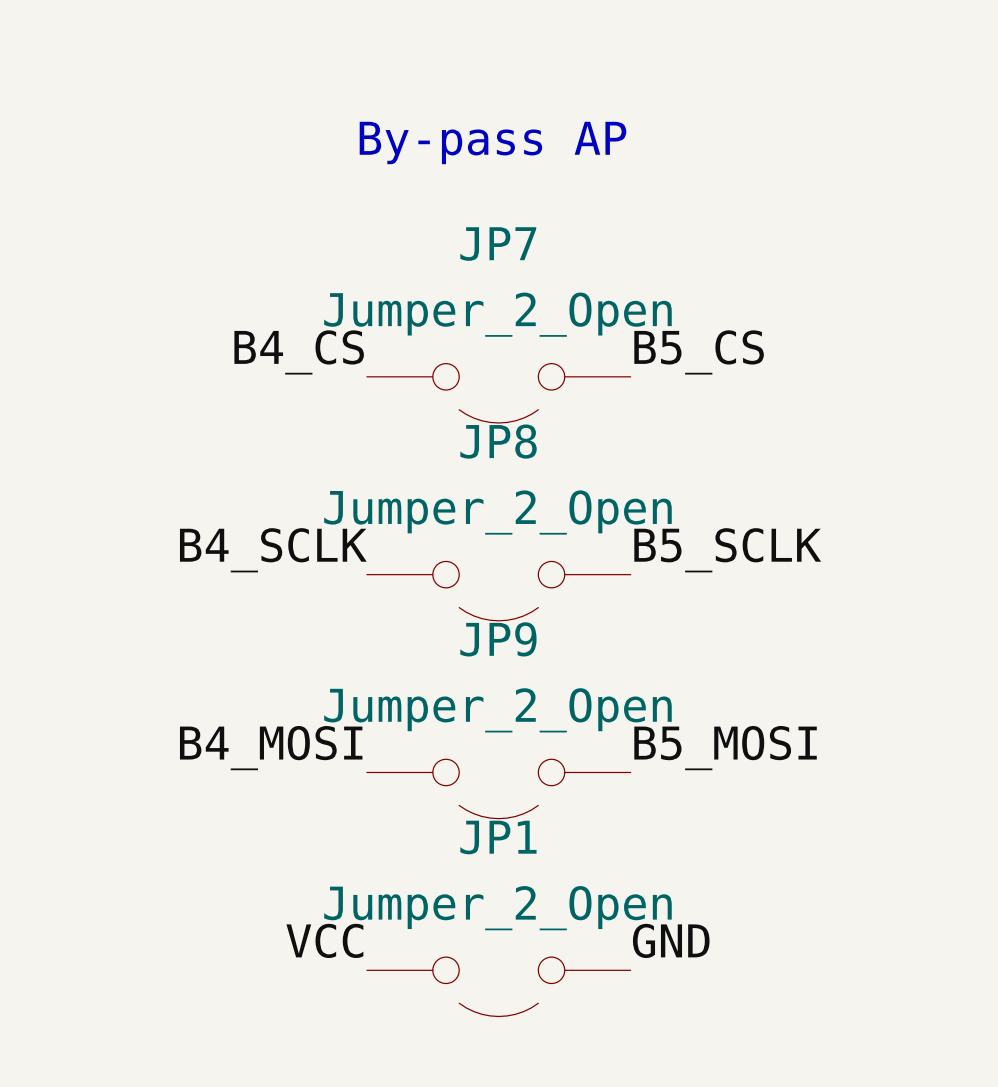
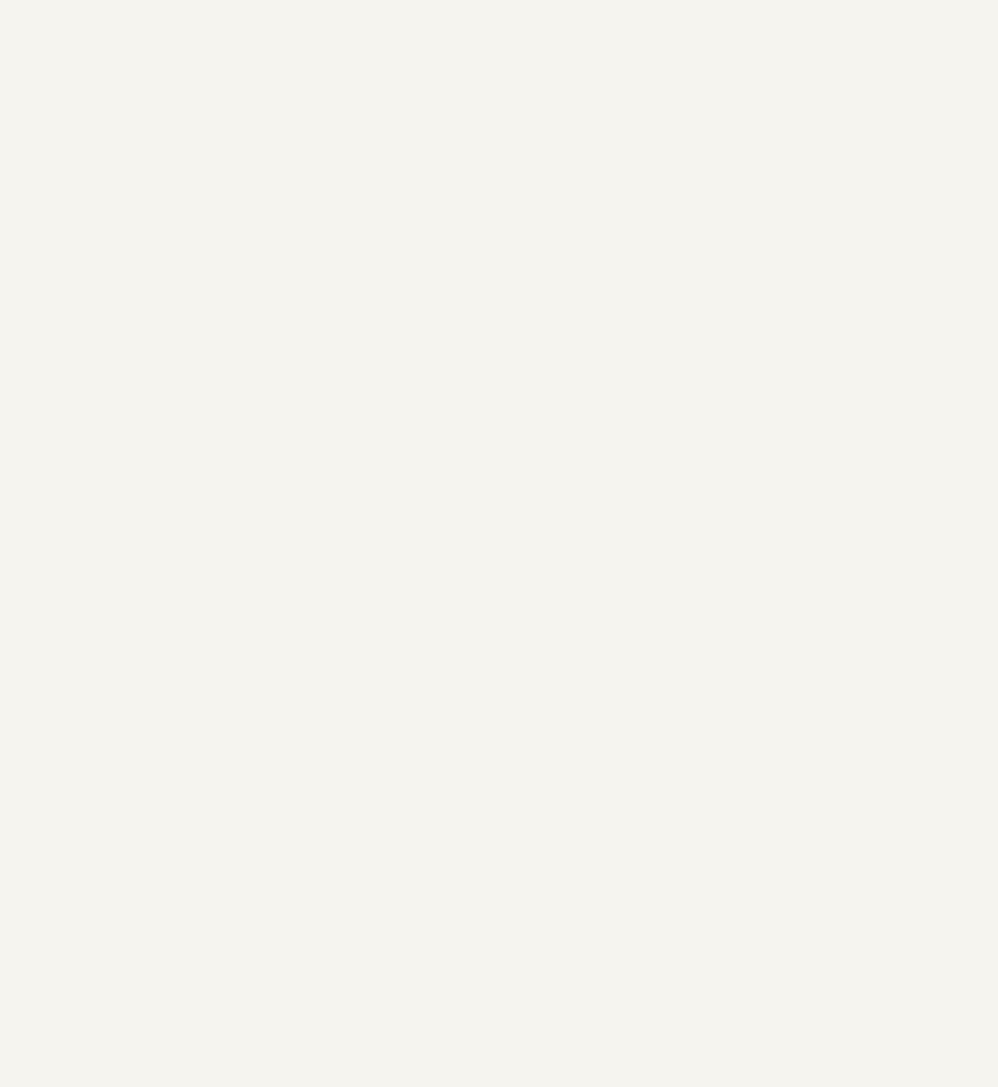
text: By-pass AP (493, 143) -> none
label: B4_CS (299, 352) -> none
label: B5_CS (699, 352) -> none
JP7: Jumper_2_Open (498, 393) -> none
label: B4_SCLK (273, 550) -> none
label: B5_SCLK (727, 550) -> none
JP8: Jumper_2_Open (498, 591) -> none
label: B4_MOSI (271, 748) -> none
label: B5_MOSI (725, 748) -> none
JP9: Jumper_2_Open (498, 788) -> none
label: VCC (324, 940) -> none
label: GND (671, 940) -> none
JP1: Jumper_2_Open (498, 986) -> none

